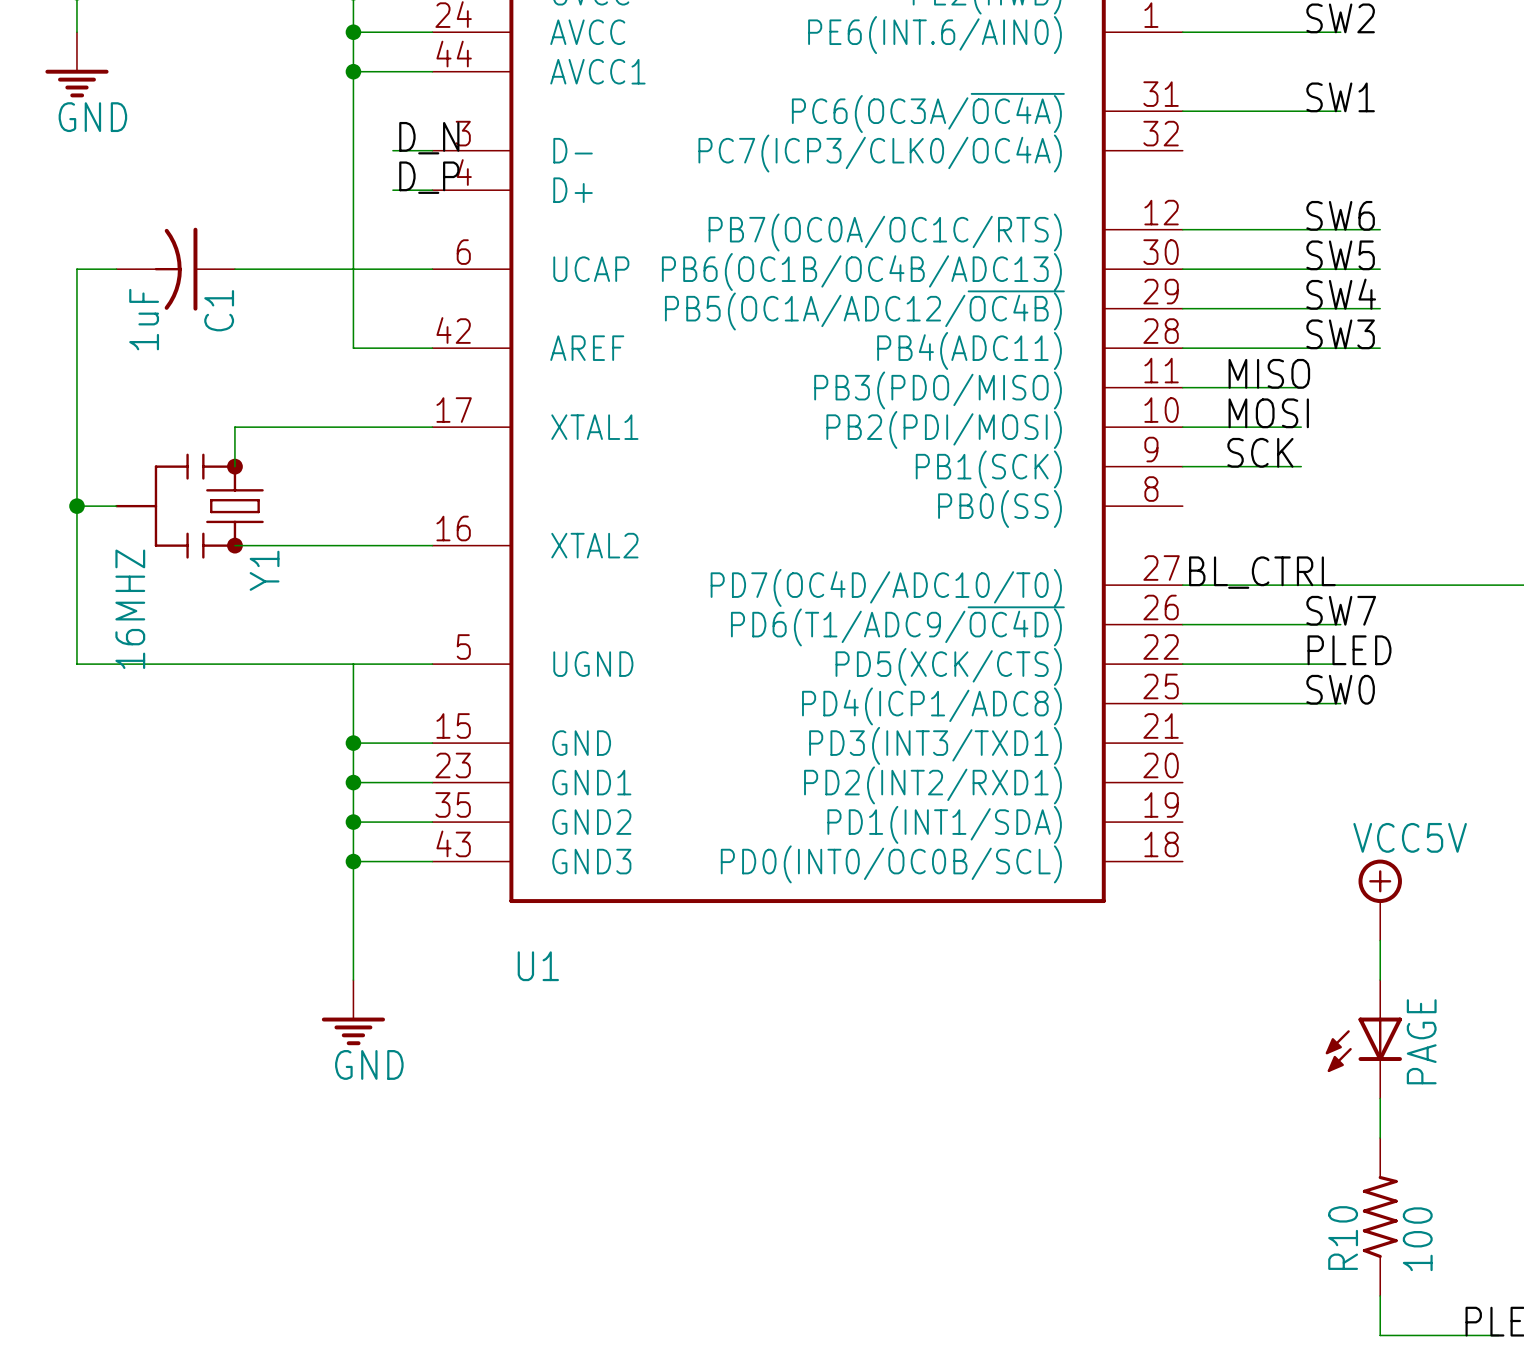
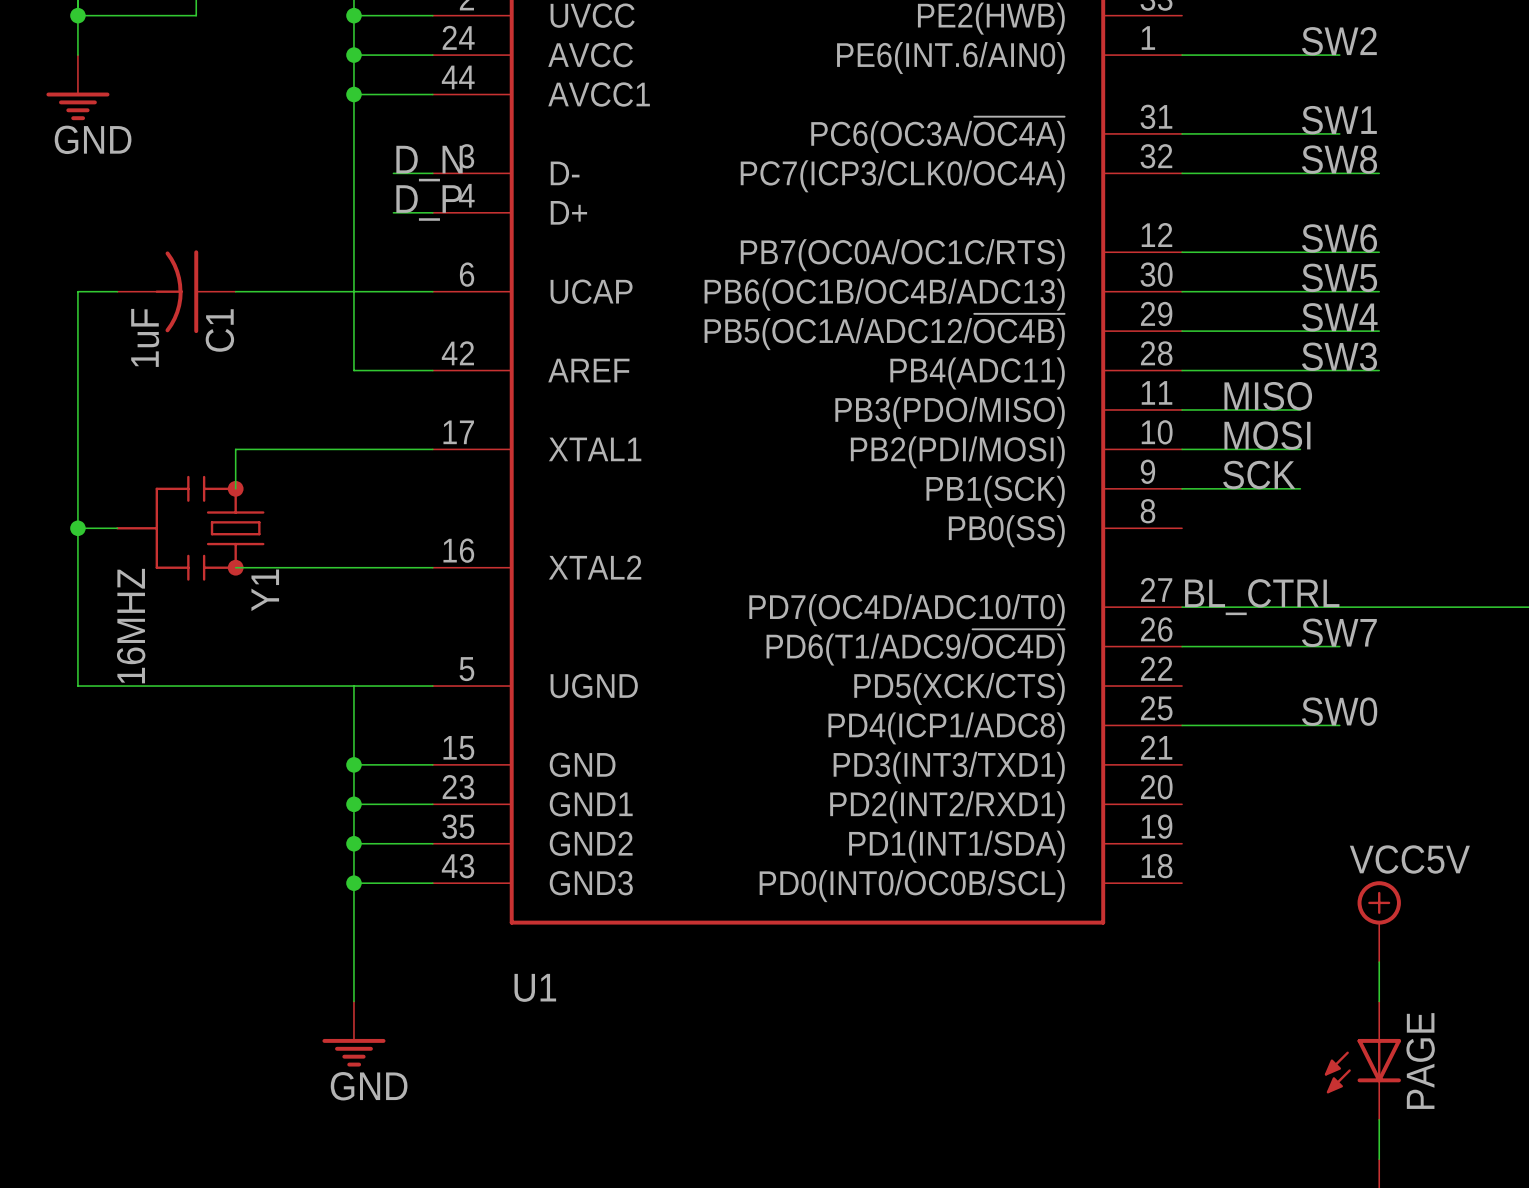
label: none -> SW8 (1339, 159)
wire: none -> (1182, 173) (1379, 173)
label: PLED (1349, 650) -> none
wire: (1182, 664) (1340, 664) -> none

